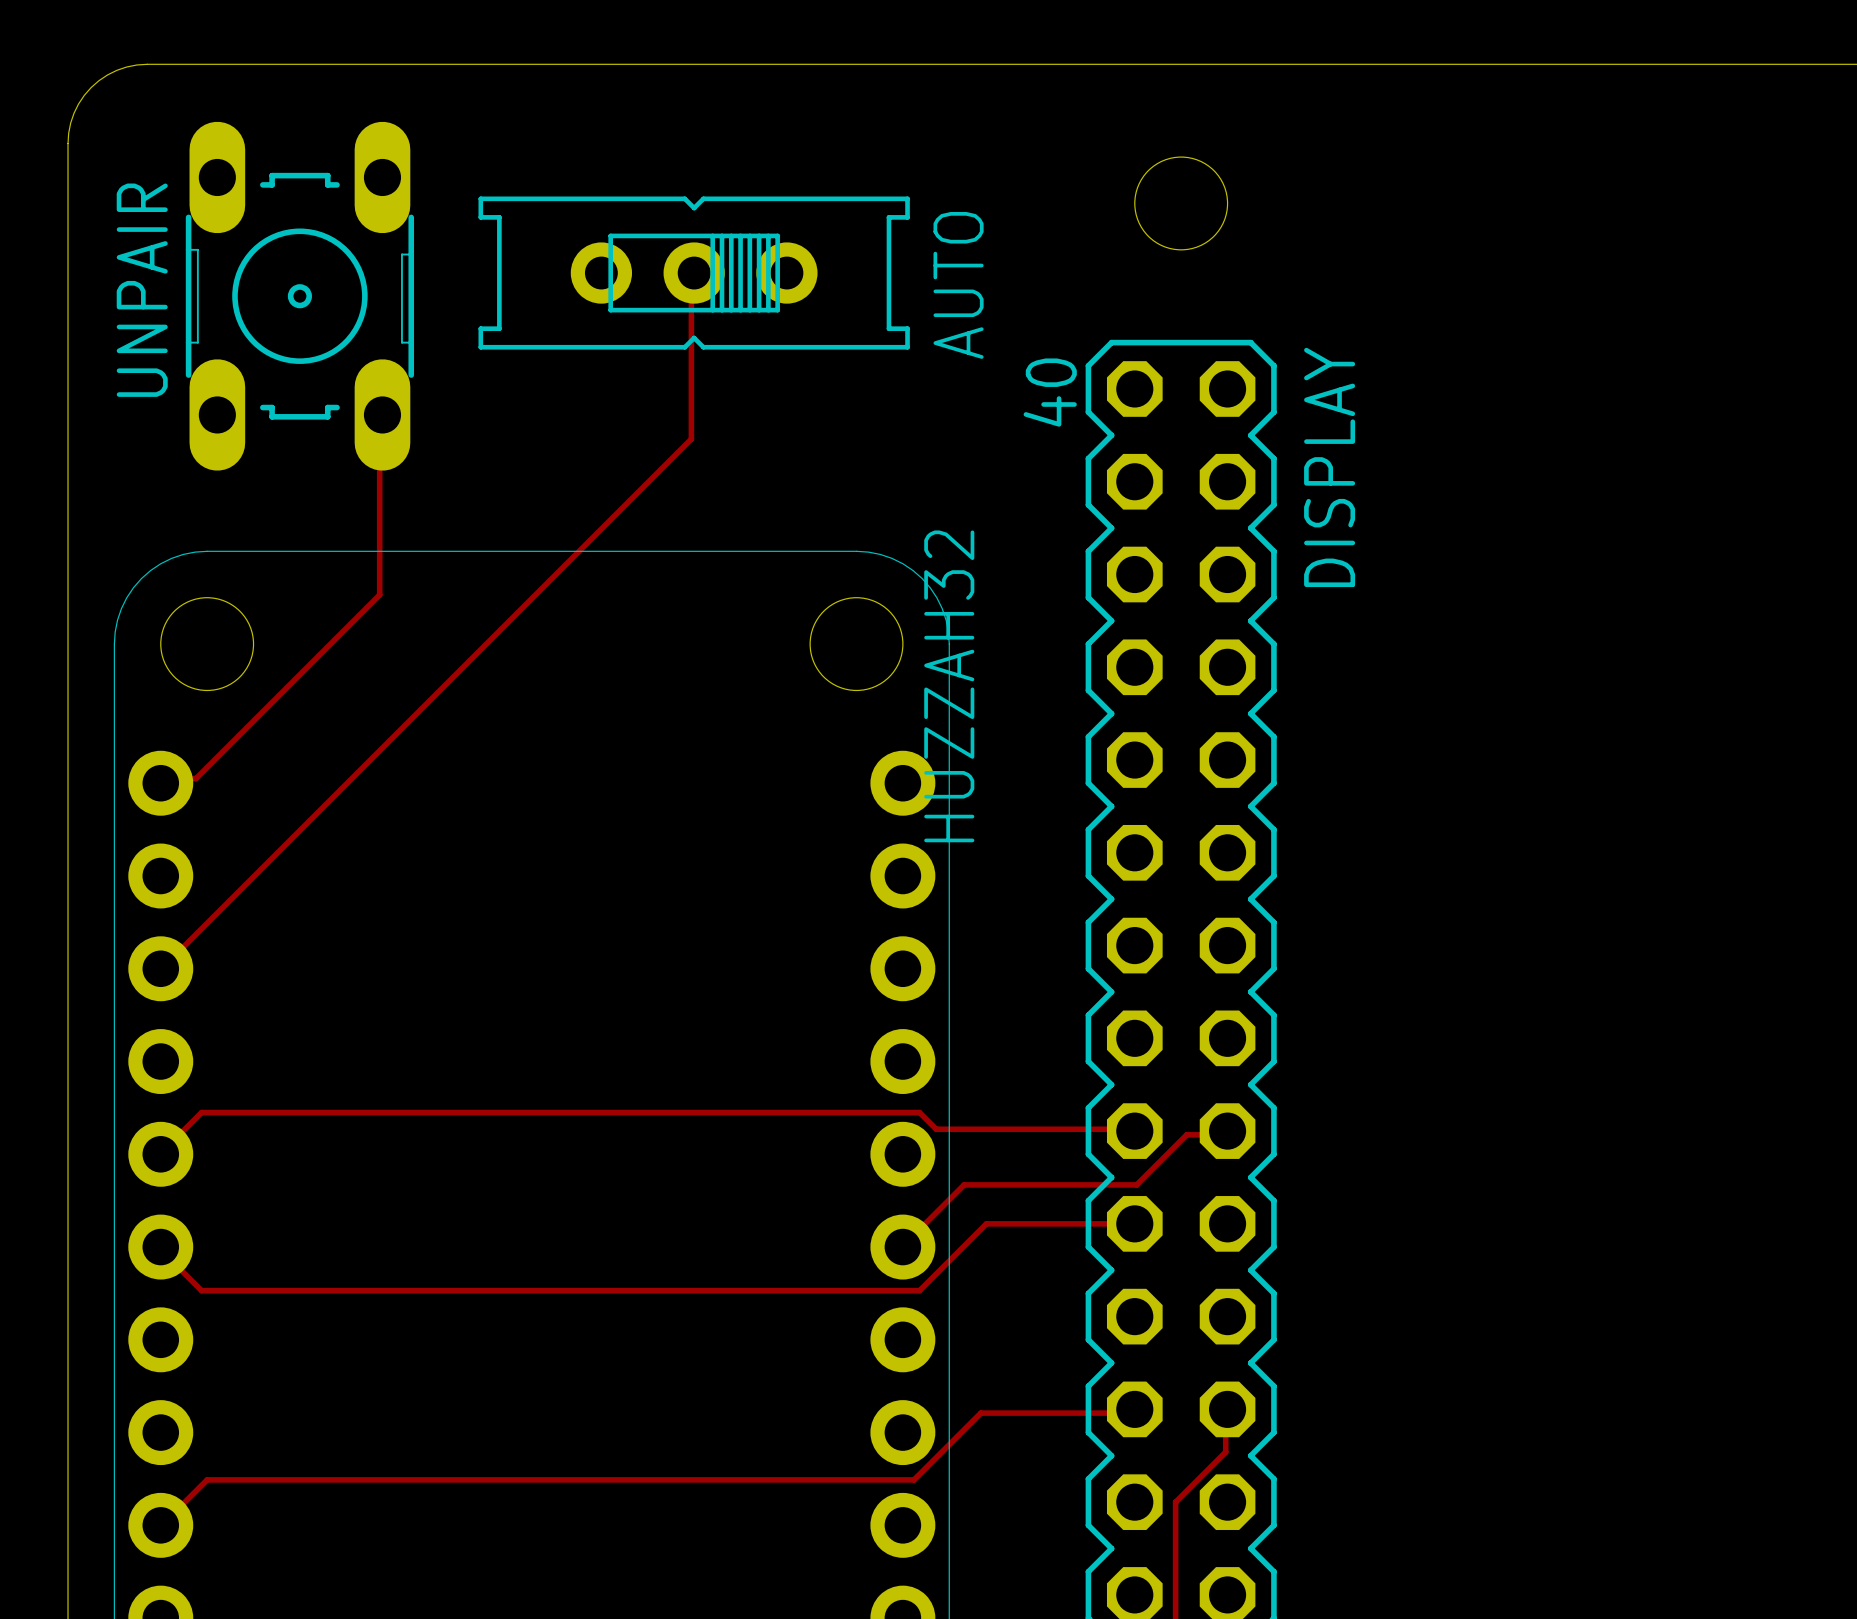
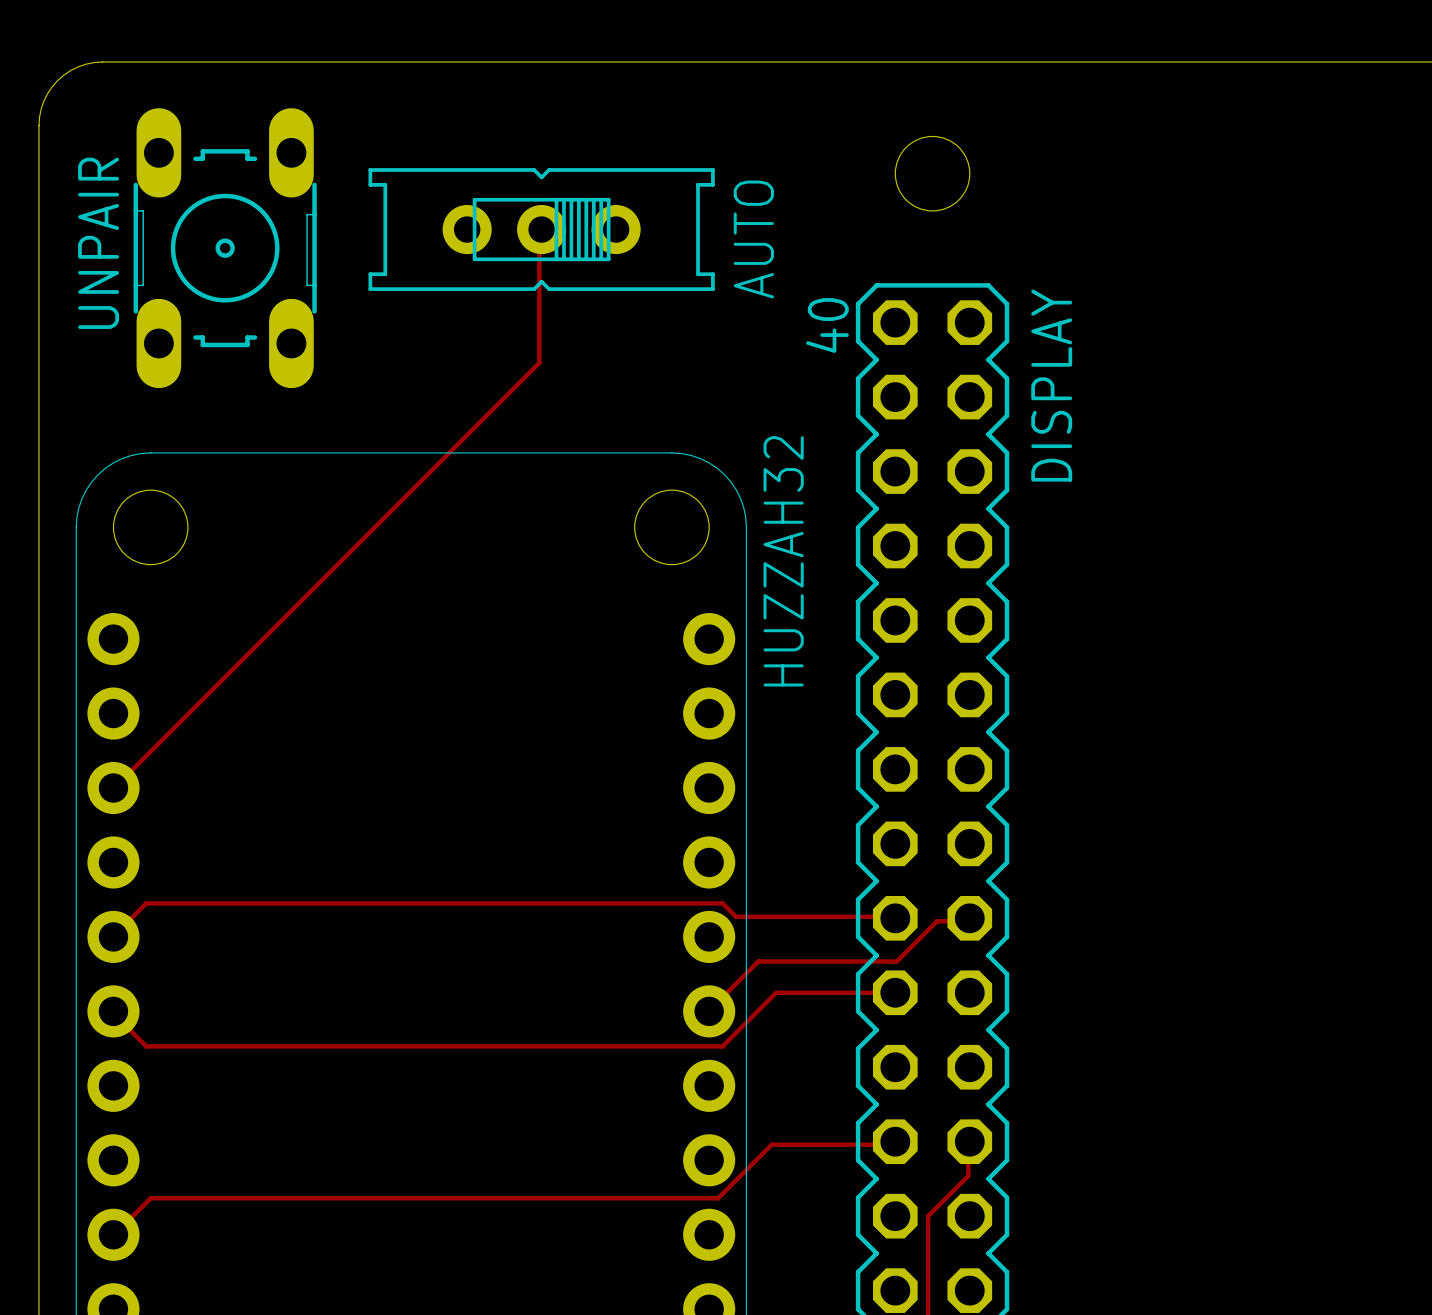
track: (382, 414) (379, 416) (379, 594) (196, 778) (162, 778) (160, 783) -> none
text position: HUZZAH32 (949, 686) -> HUZZAH32 (783, 561)

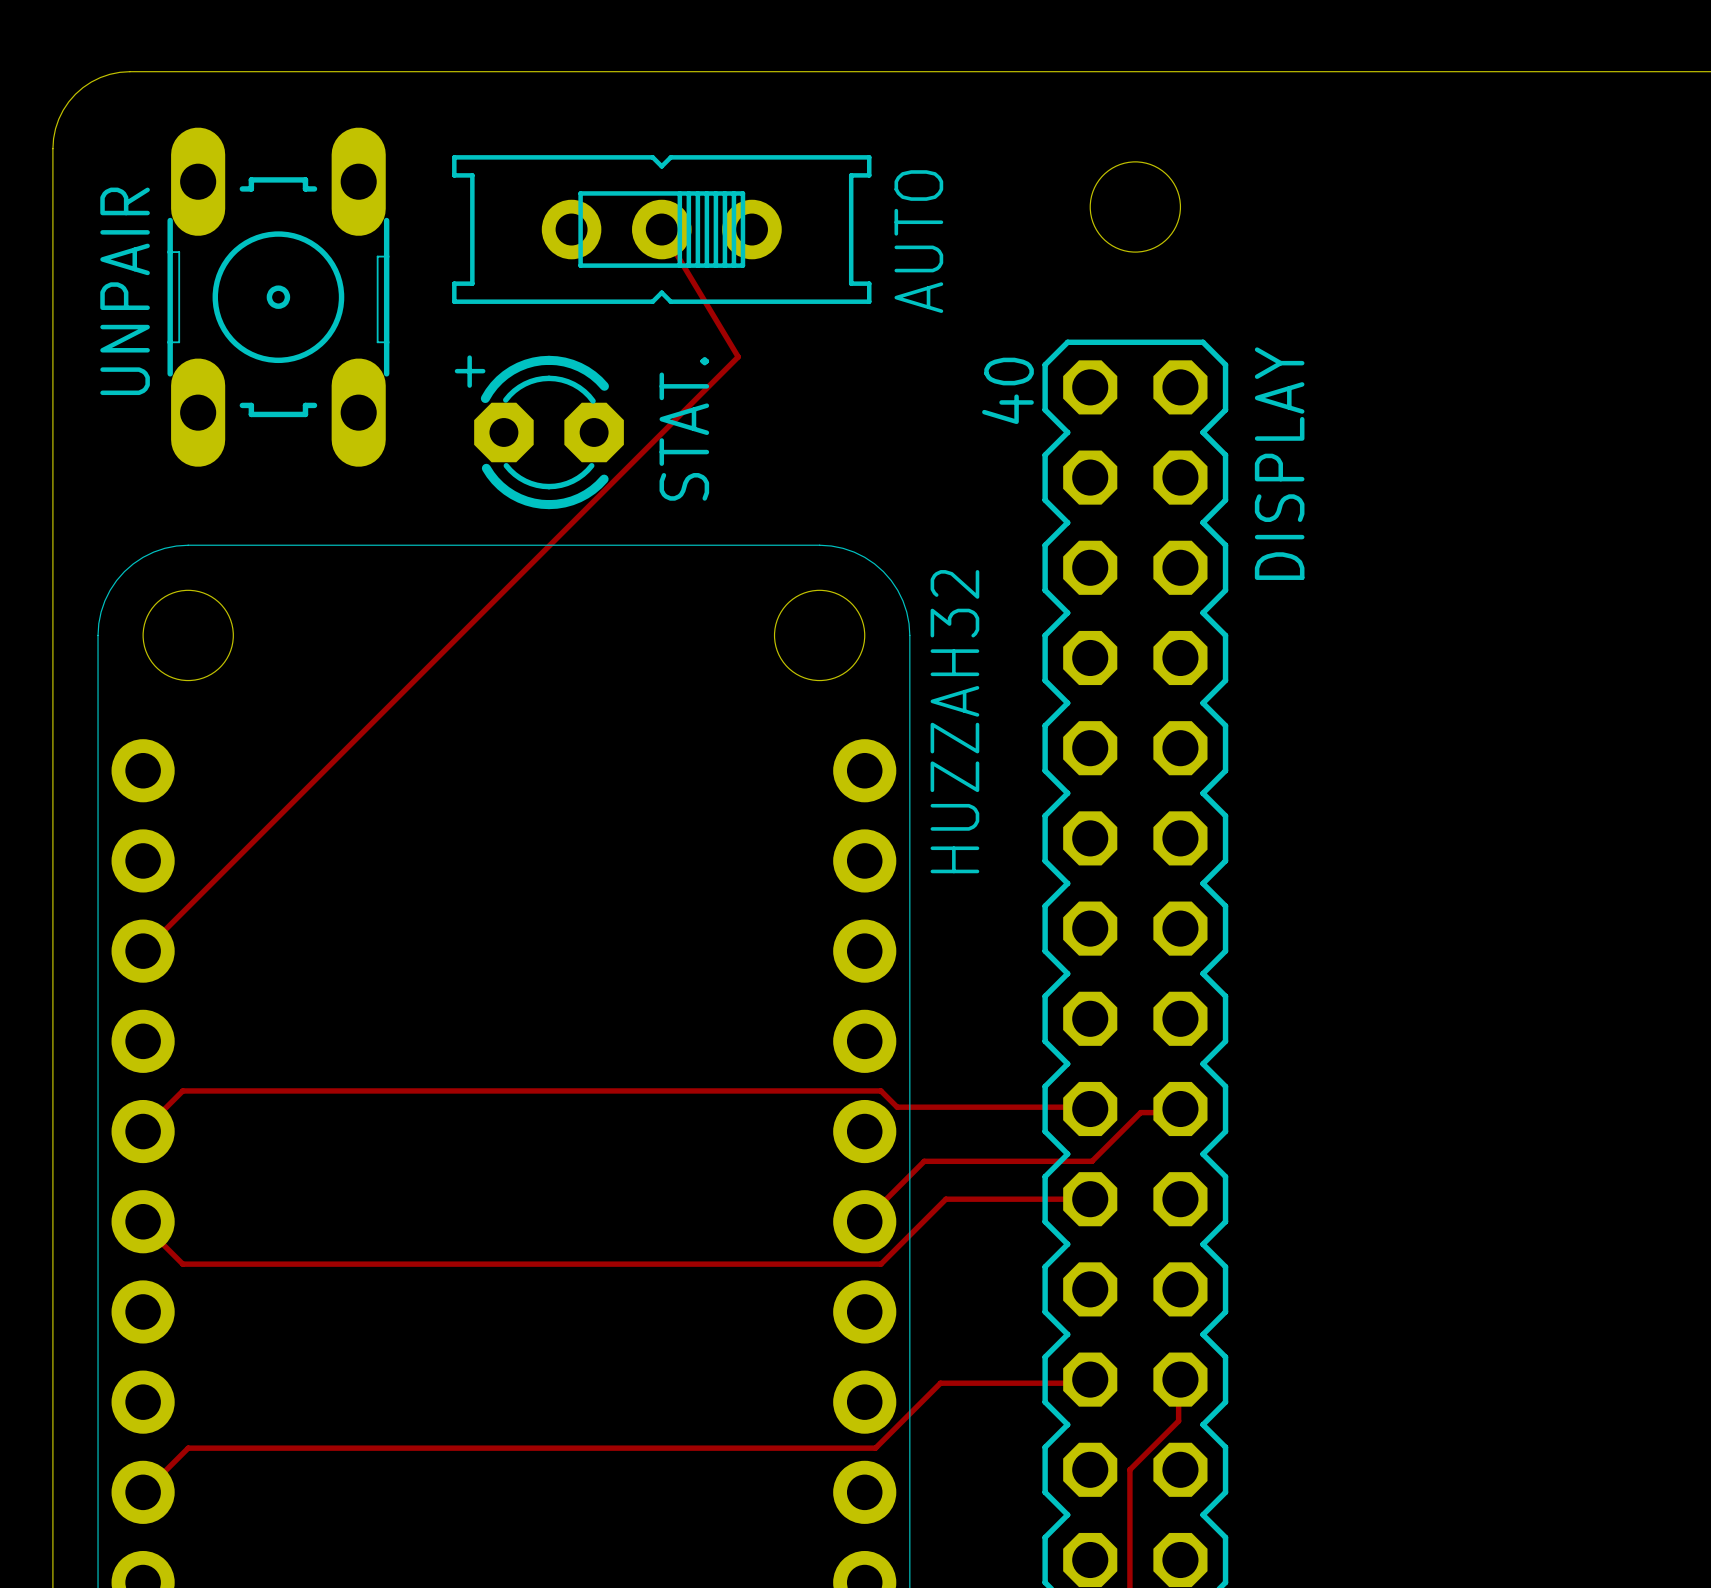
track: (541, 229) (539, 233) (539, 362) -> (661, 229) (738, 356) (659, 436)
AUTO position: (541, 229) -> (661, 229)
STAT.: none -> (539, 432)
text position: HUZZAH32 (783, 561) -> HUZZAH32 (954, 721)

